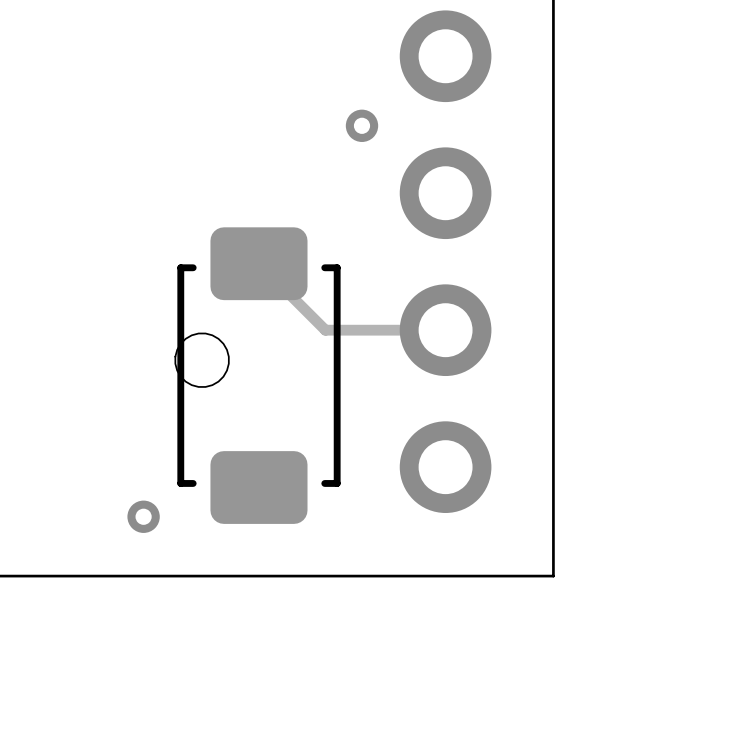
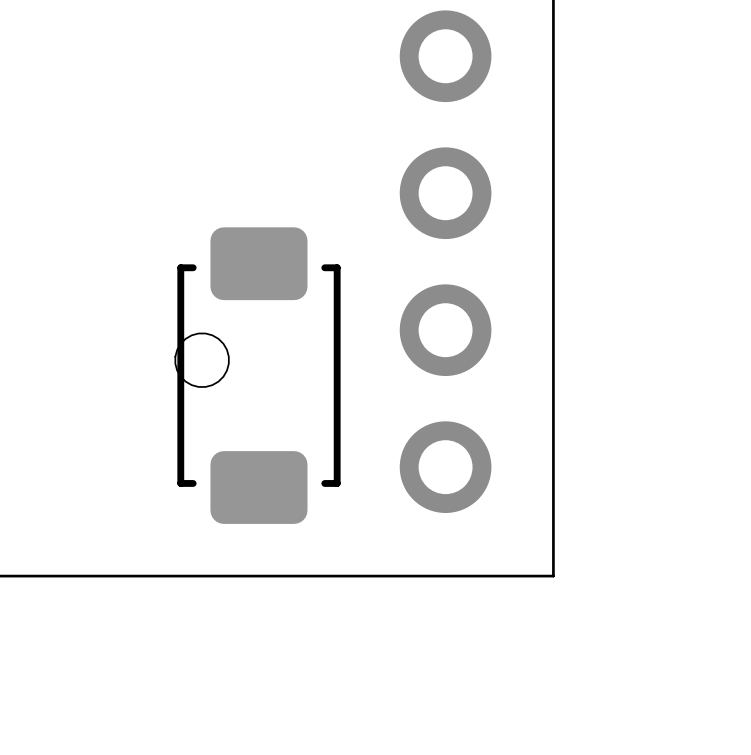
via: (361, 125) -> none
track: (258, 263) (325, 330) (445, 330) -> none
via: (143, 516) -> none

